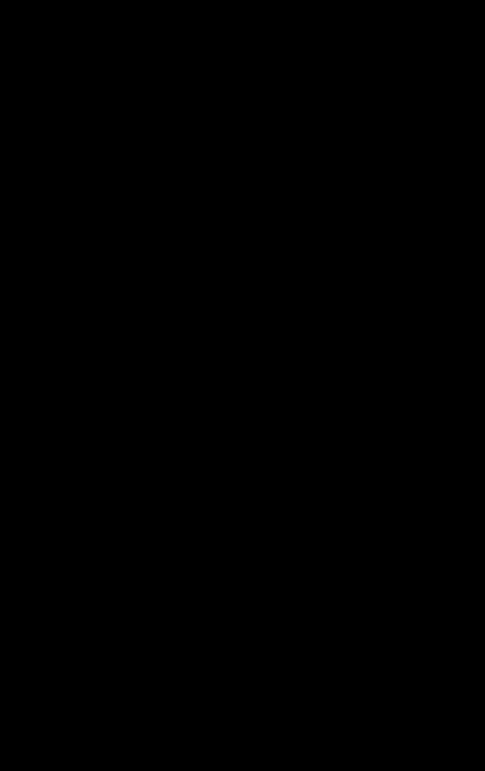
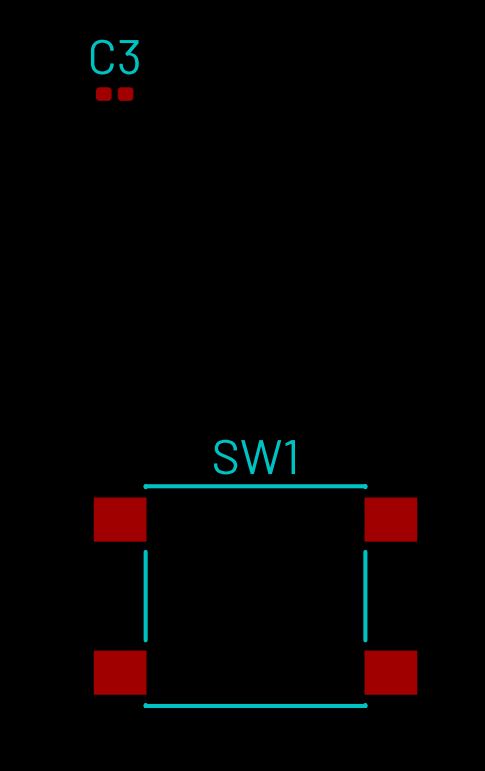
C3: none -> (114, 94)
SW1: none -> (255, 596)

